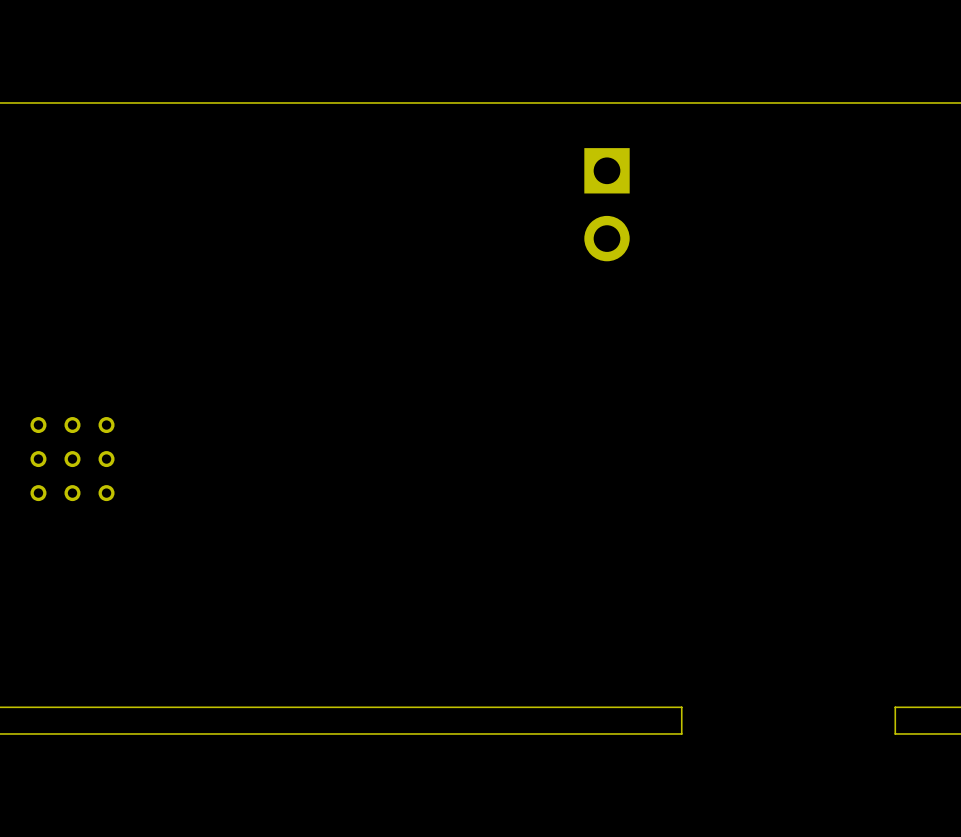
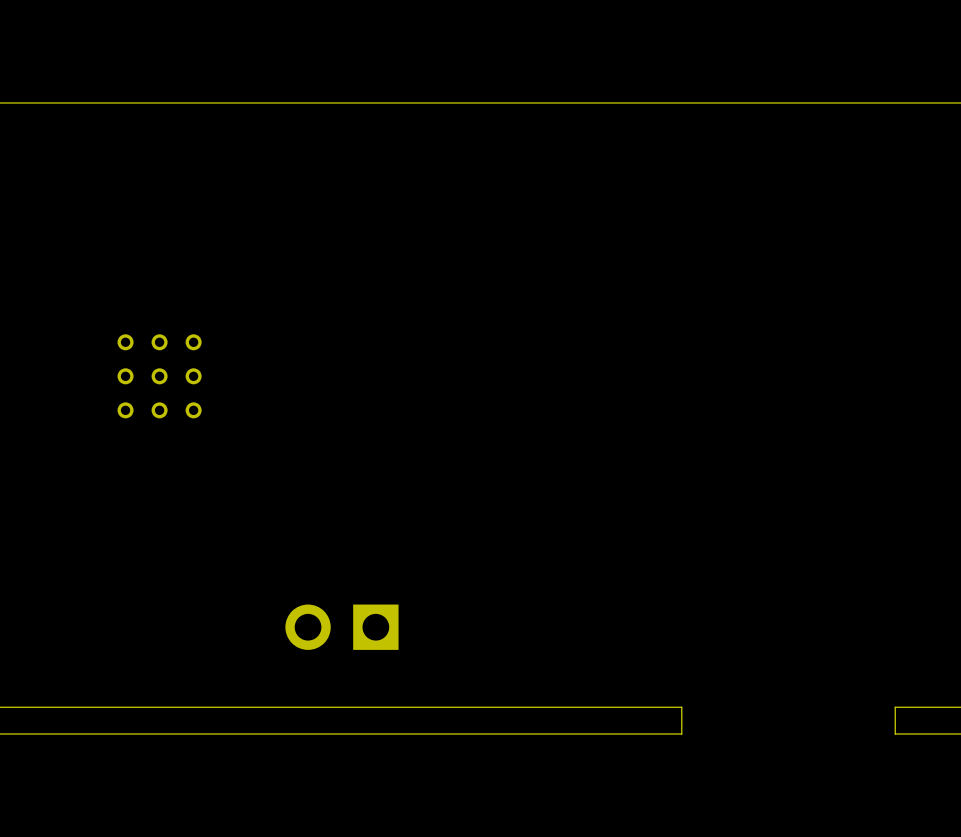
part rotation: 0° (607, 204) -> 90° clockwise (341, 627)
part position: (607, 204) -> (341, 627)
part position: (72, 459) -> (159, 376)

